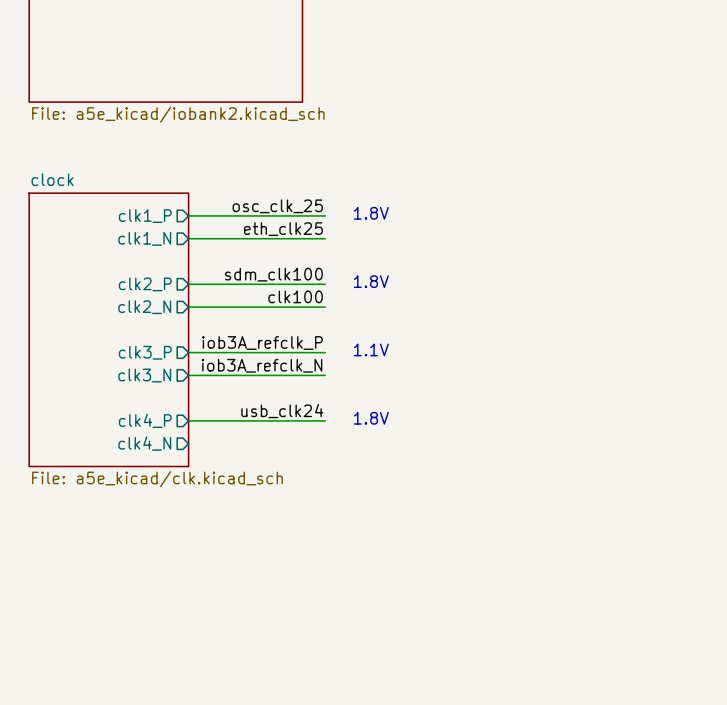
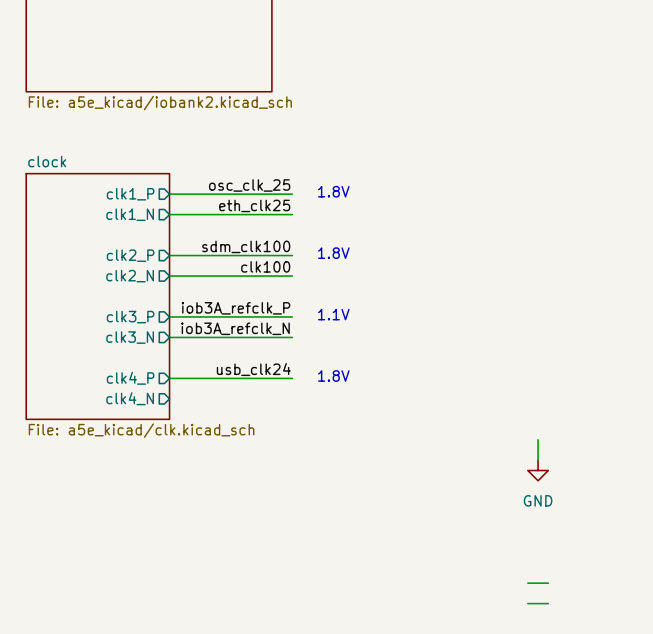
wire: none -> (538, 439) (538, 460)
power symbol: none -> GND (538, 470)
wire: none -> (527, 583) (548, 583)
wire: none -> (527, 603) (548, 603)

